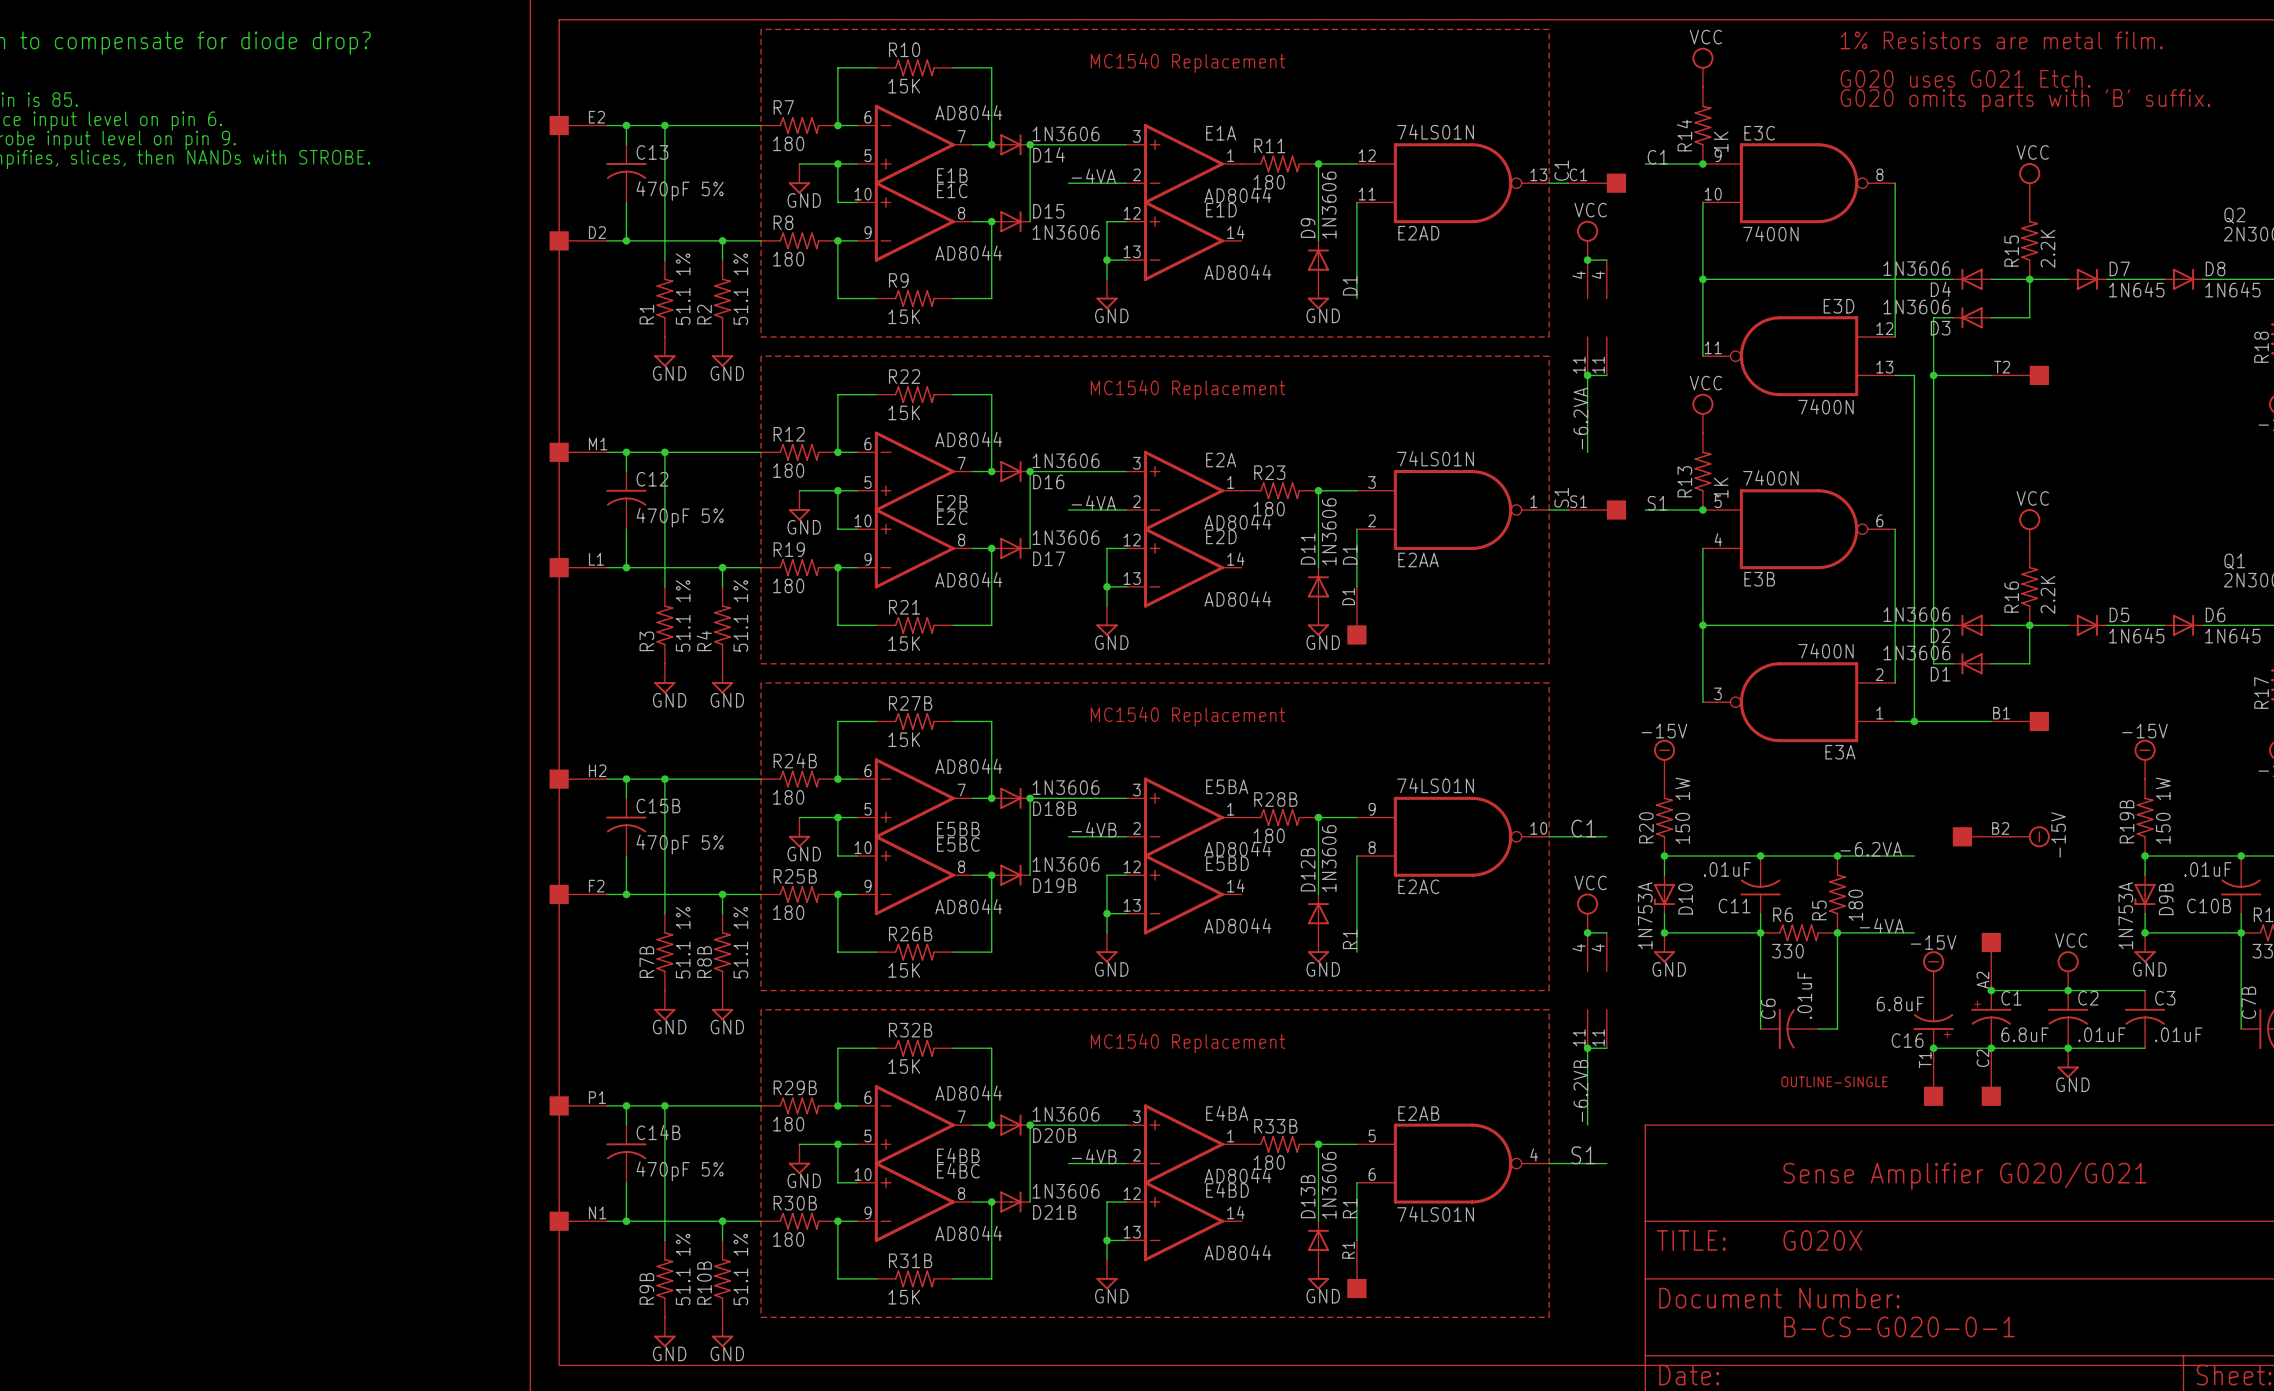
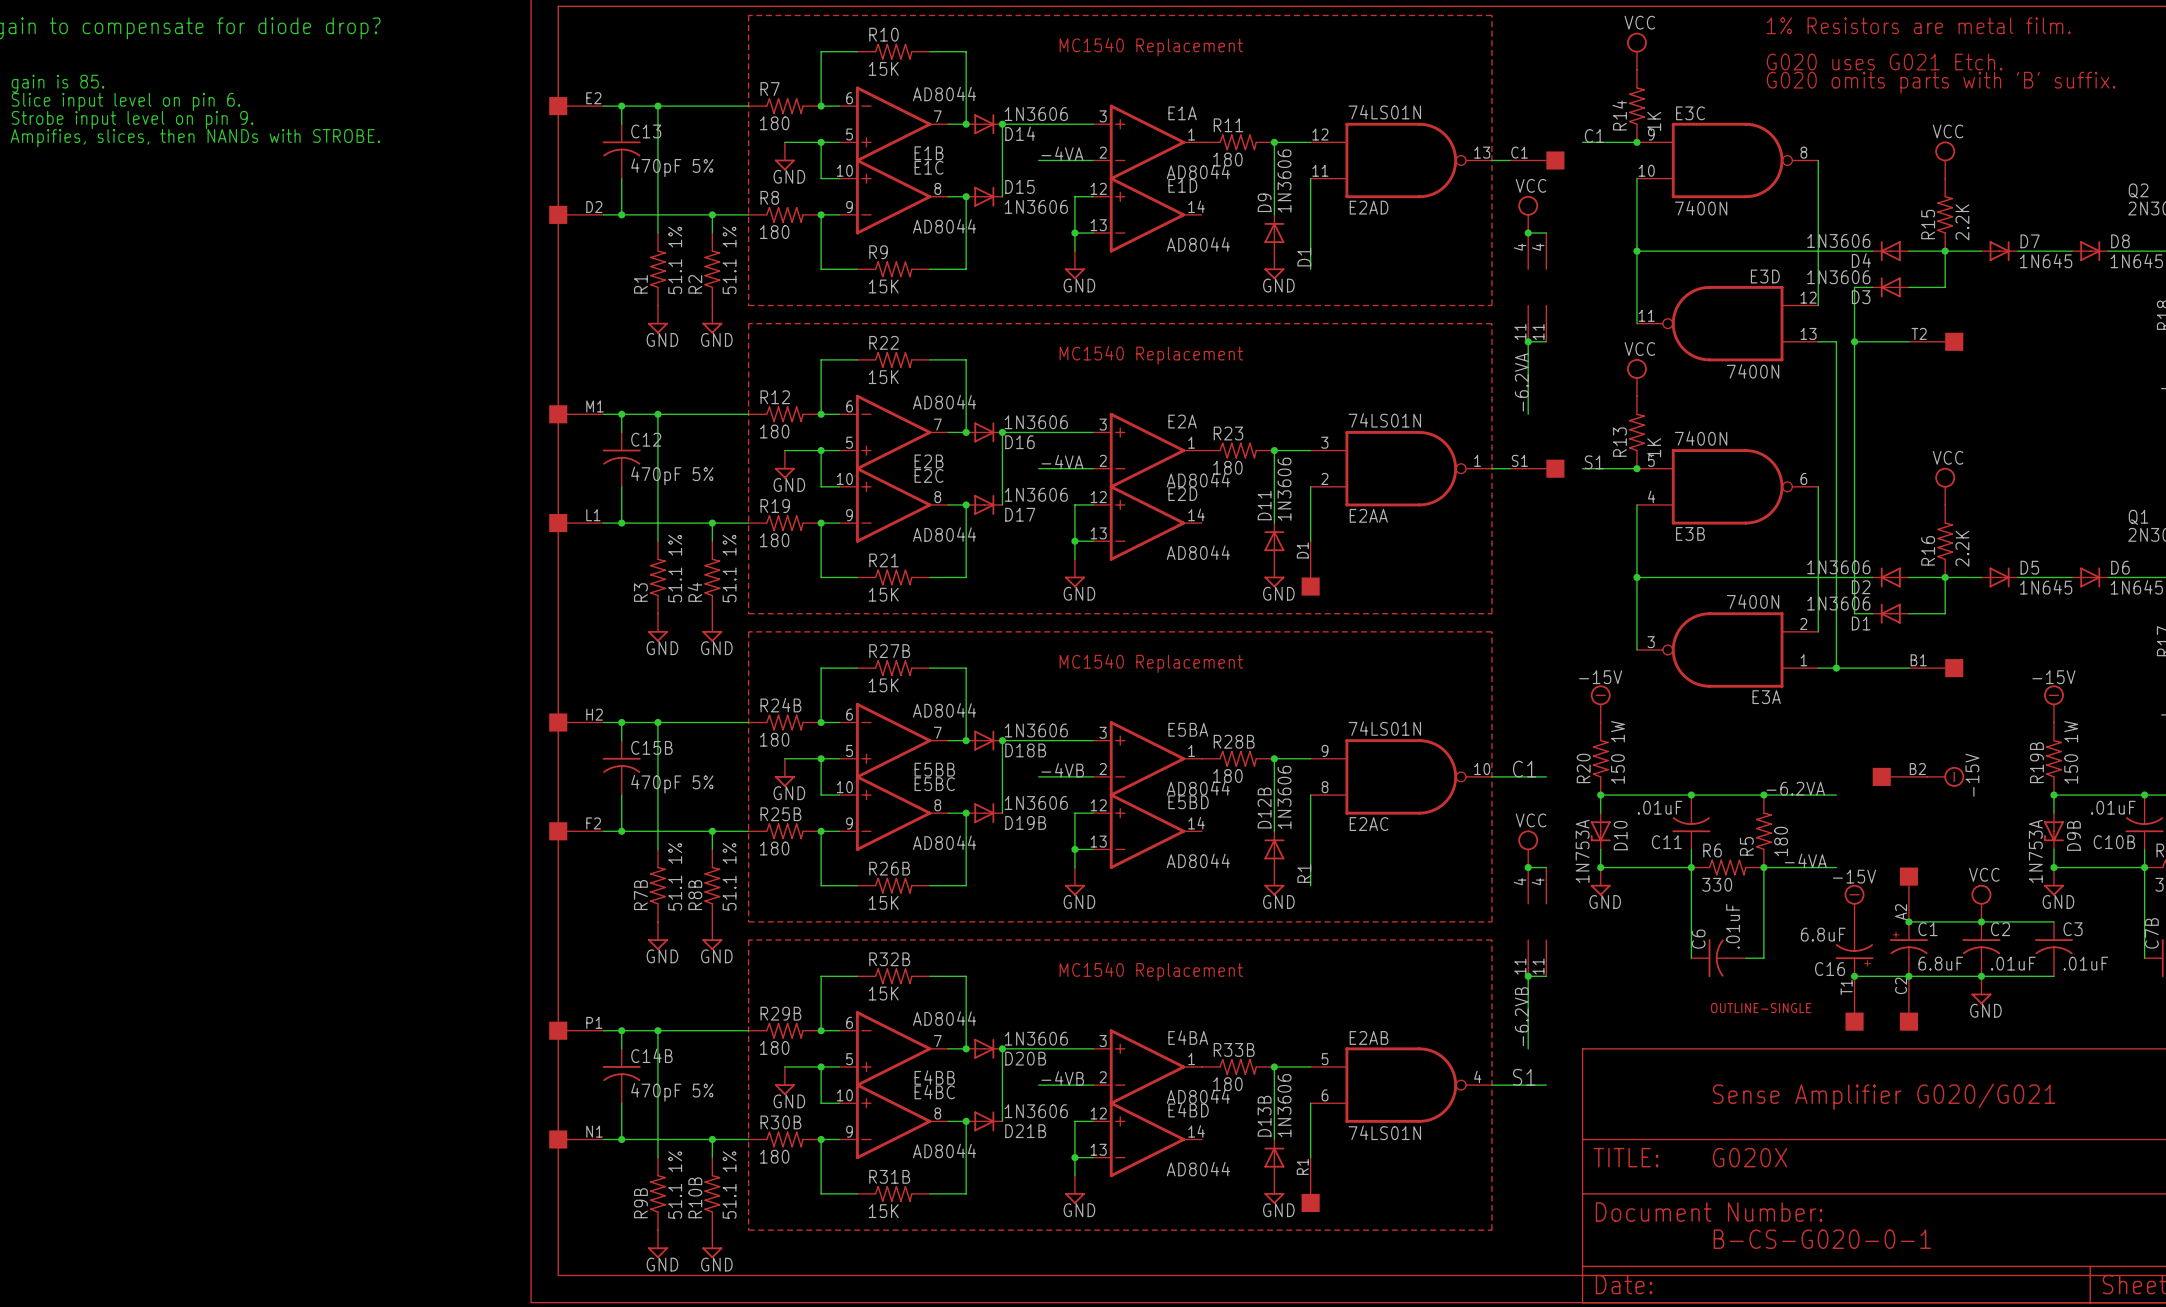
label: C1 (1561, 170) -> none
label: S1 (1561, 497) -> none
label: D1 (1350, 554) -> none
label: R1 (1350, 1208) -> none

